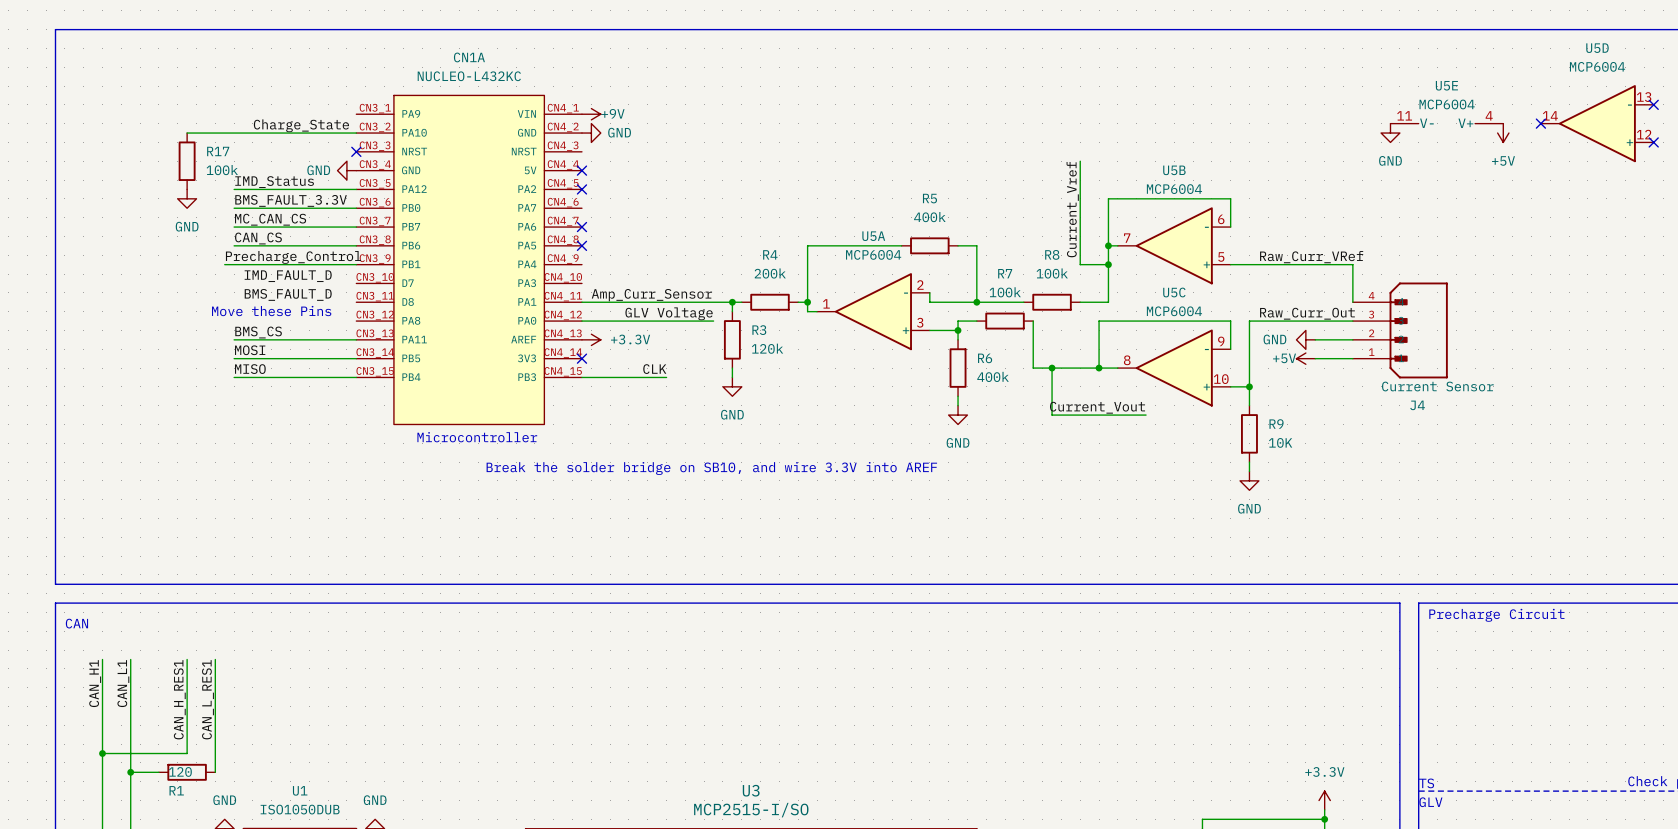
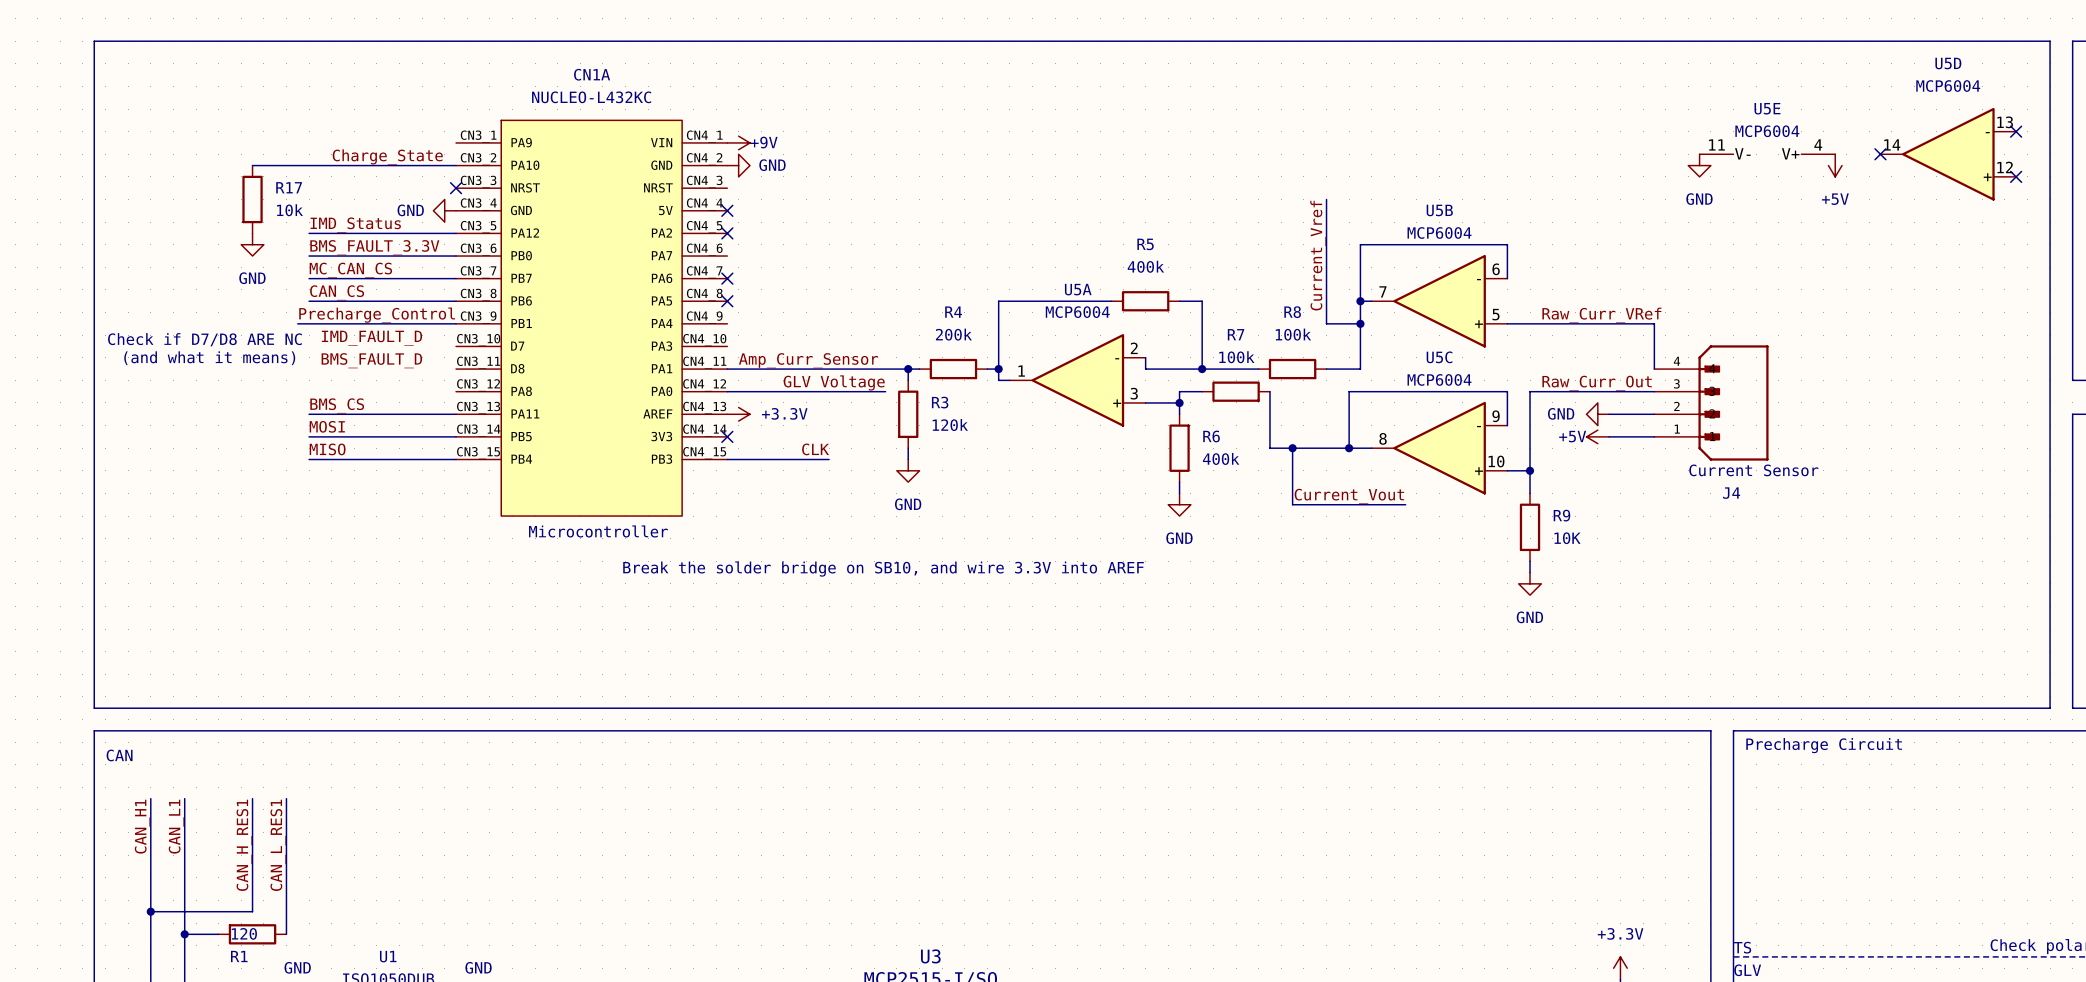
R17 value: 100k (222, 170) -> 10k (289, 210)
text: none -> Check if D7/D8 ARE NC (204, 339)
text: none -> (and what it means) (209, 358)
text: Move these Pins (271, 311) -> none

